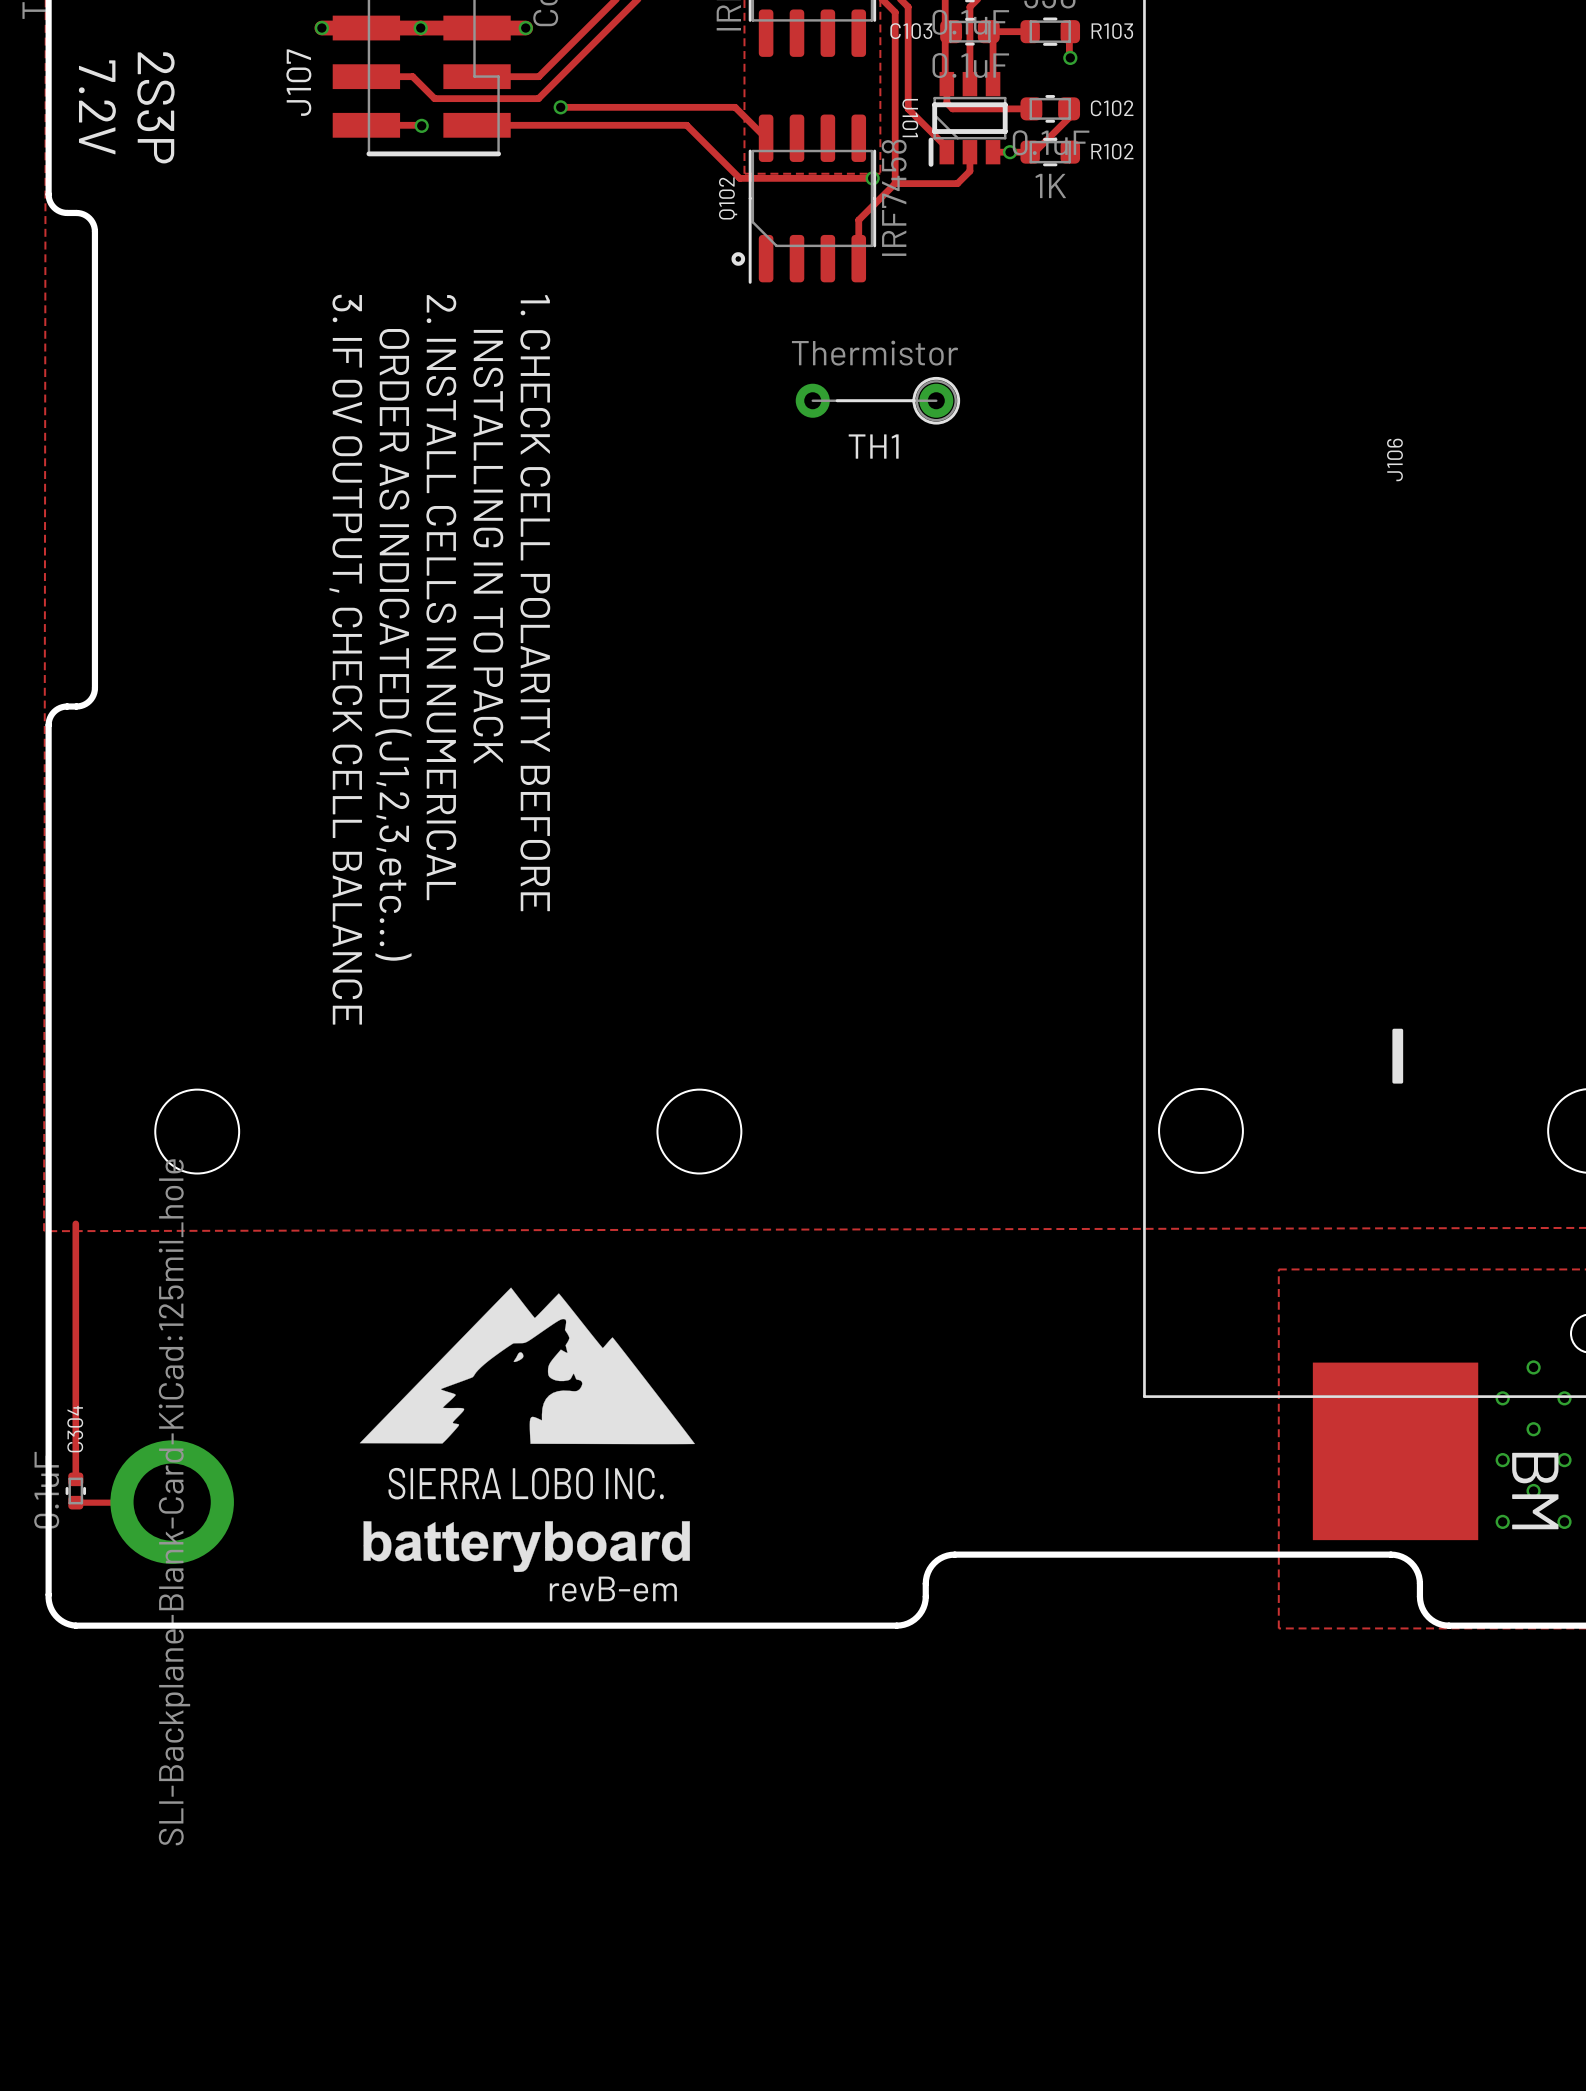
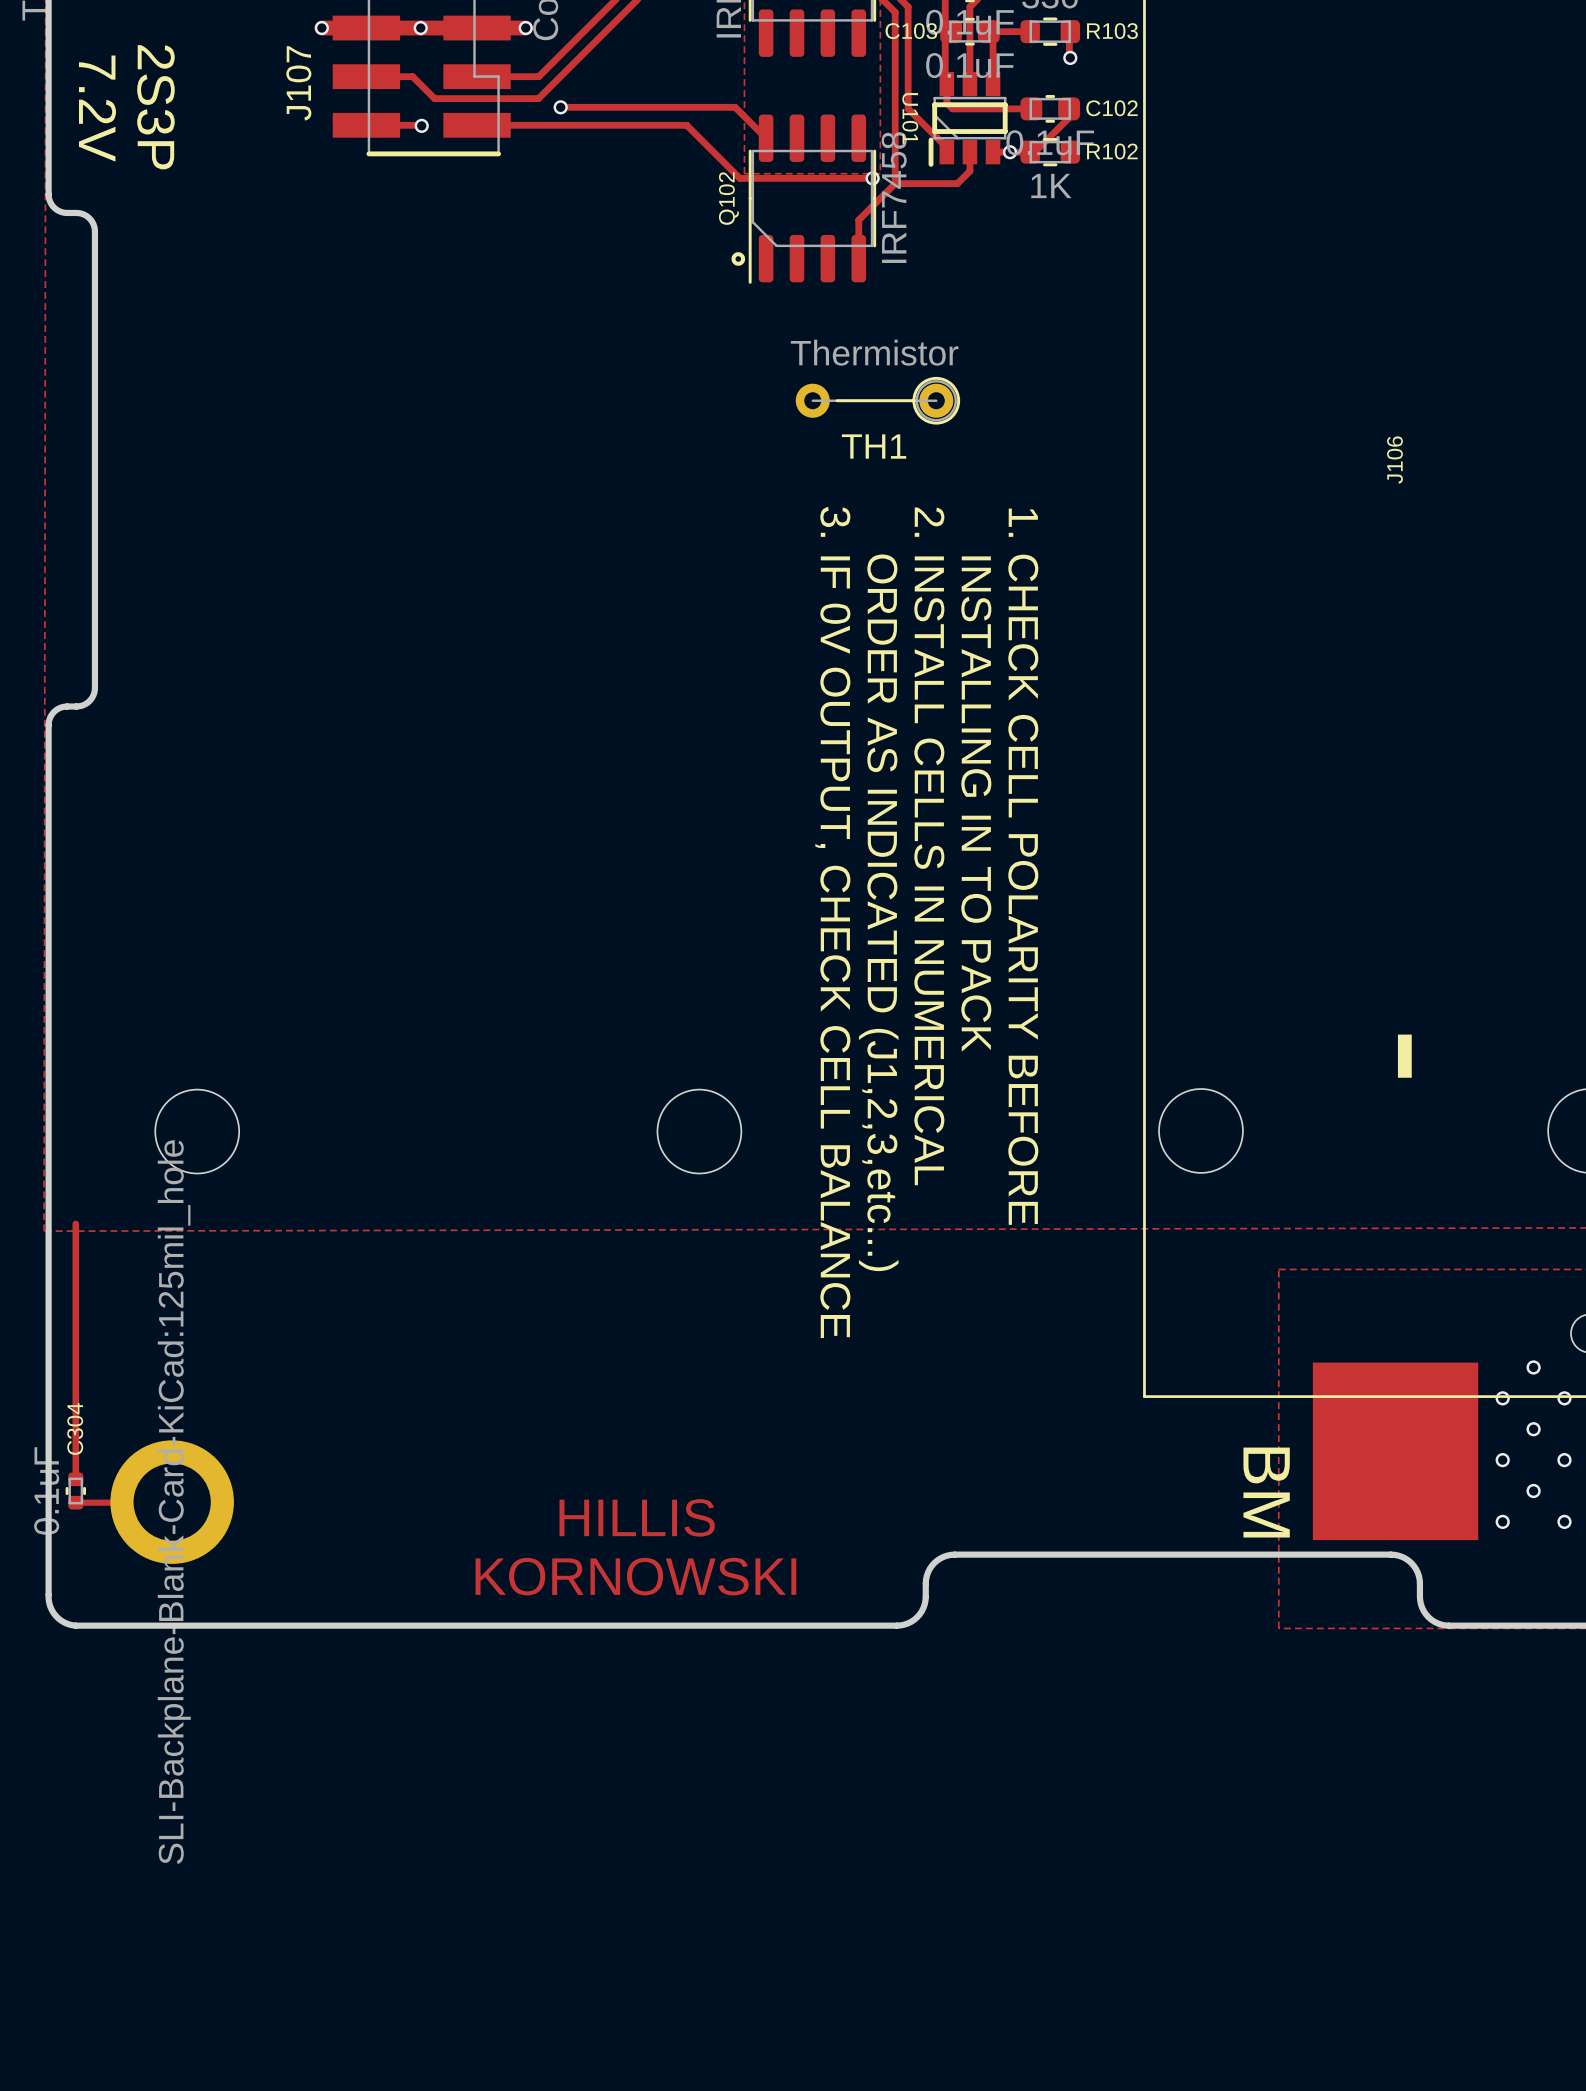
text position: INSTALLING IN TO PACK (488, 546) -> INSTALLING IN TO PACK (976, 804)
text position: 2. INSTALL CELLS IN NUMERICAL (441, 597) -> 2. INSTALL CELLS IN NUMERICAL (929, 846)
text position: 1. CHECK CELL POLARITY BEFORE (535, 603) -> 1. CHECK CELL POLARITY BEFORE (1023, 866)
text position: ORDER AS INDICATED (J1,2,3,etc...) (393, 644) -> ORDER AS INDICATED (J1,2,3,etc...) (878, 912)
text position: 3. IF 0V OUTPUT, CHECK CELL BALANCE (345, 659) -> 3. IF 0V OUTPUT, CHECK CELL BALANCE (832, 922)
drawing: [359, 1287, 695, 1445] -> none
text: SIERRA LOBO INC. (526, 1483) -> none
text position: BM (1535, 1491) -> BM (1266, 1492)
text: none -> HILLIS (637, 1517)
drawing: [363, 1521, 690, 1573] -> none
text: none -> KORNOWSKI (635, 1576)
text: revB-em (613, 1589) -> none

